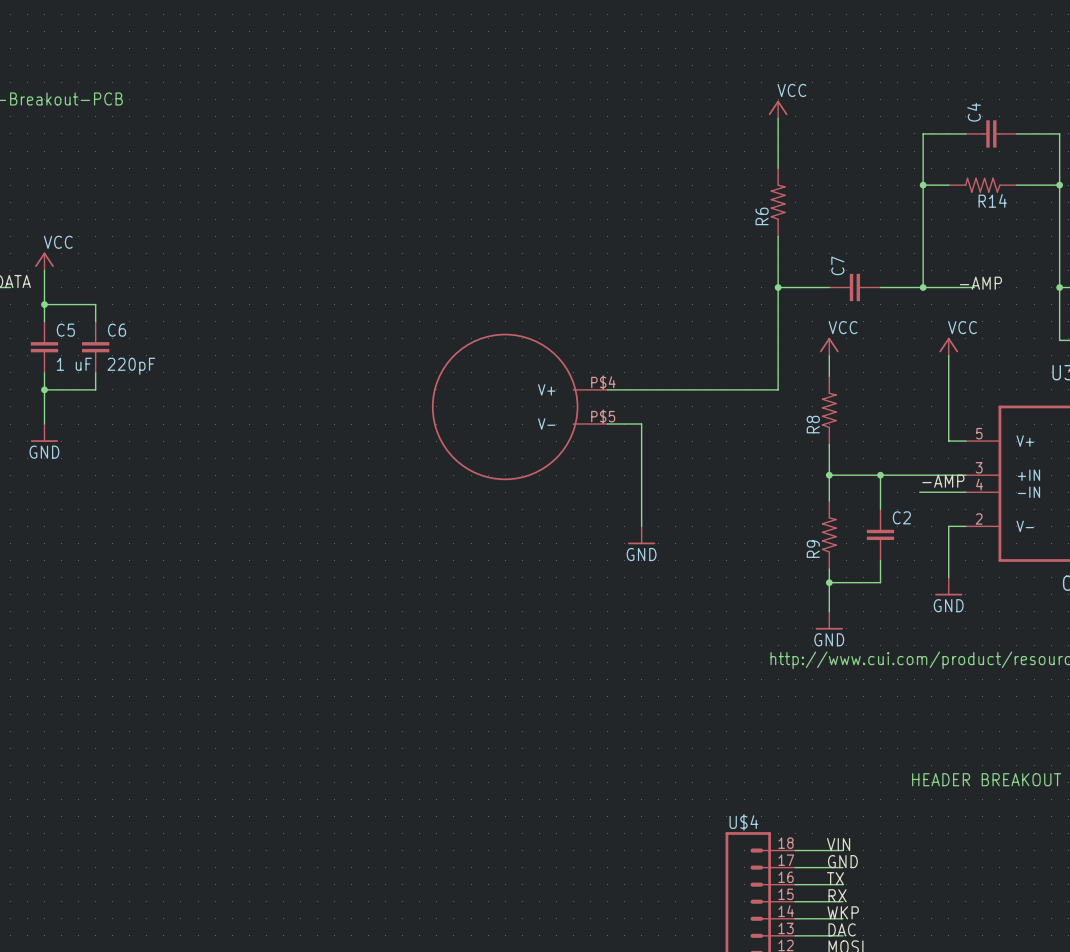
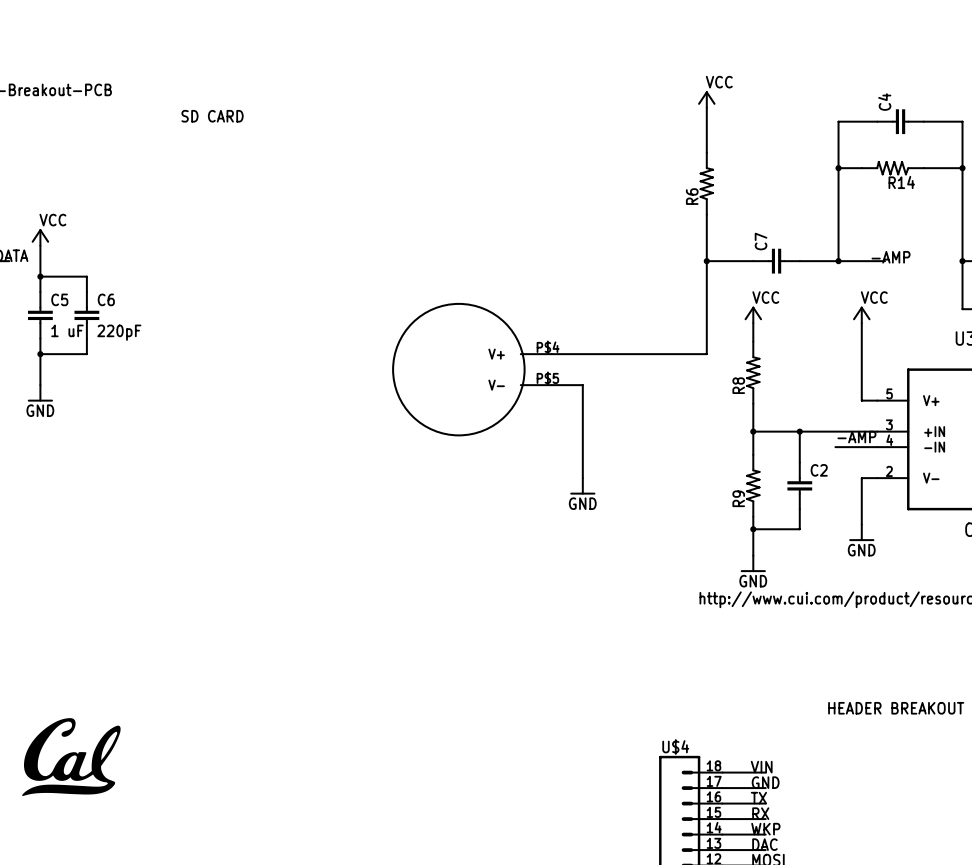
text: none -> SD CARD (212, 116)
part: none -> (71, 757)

